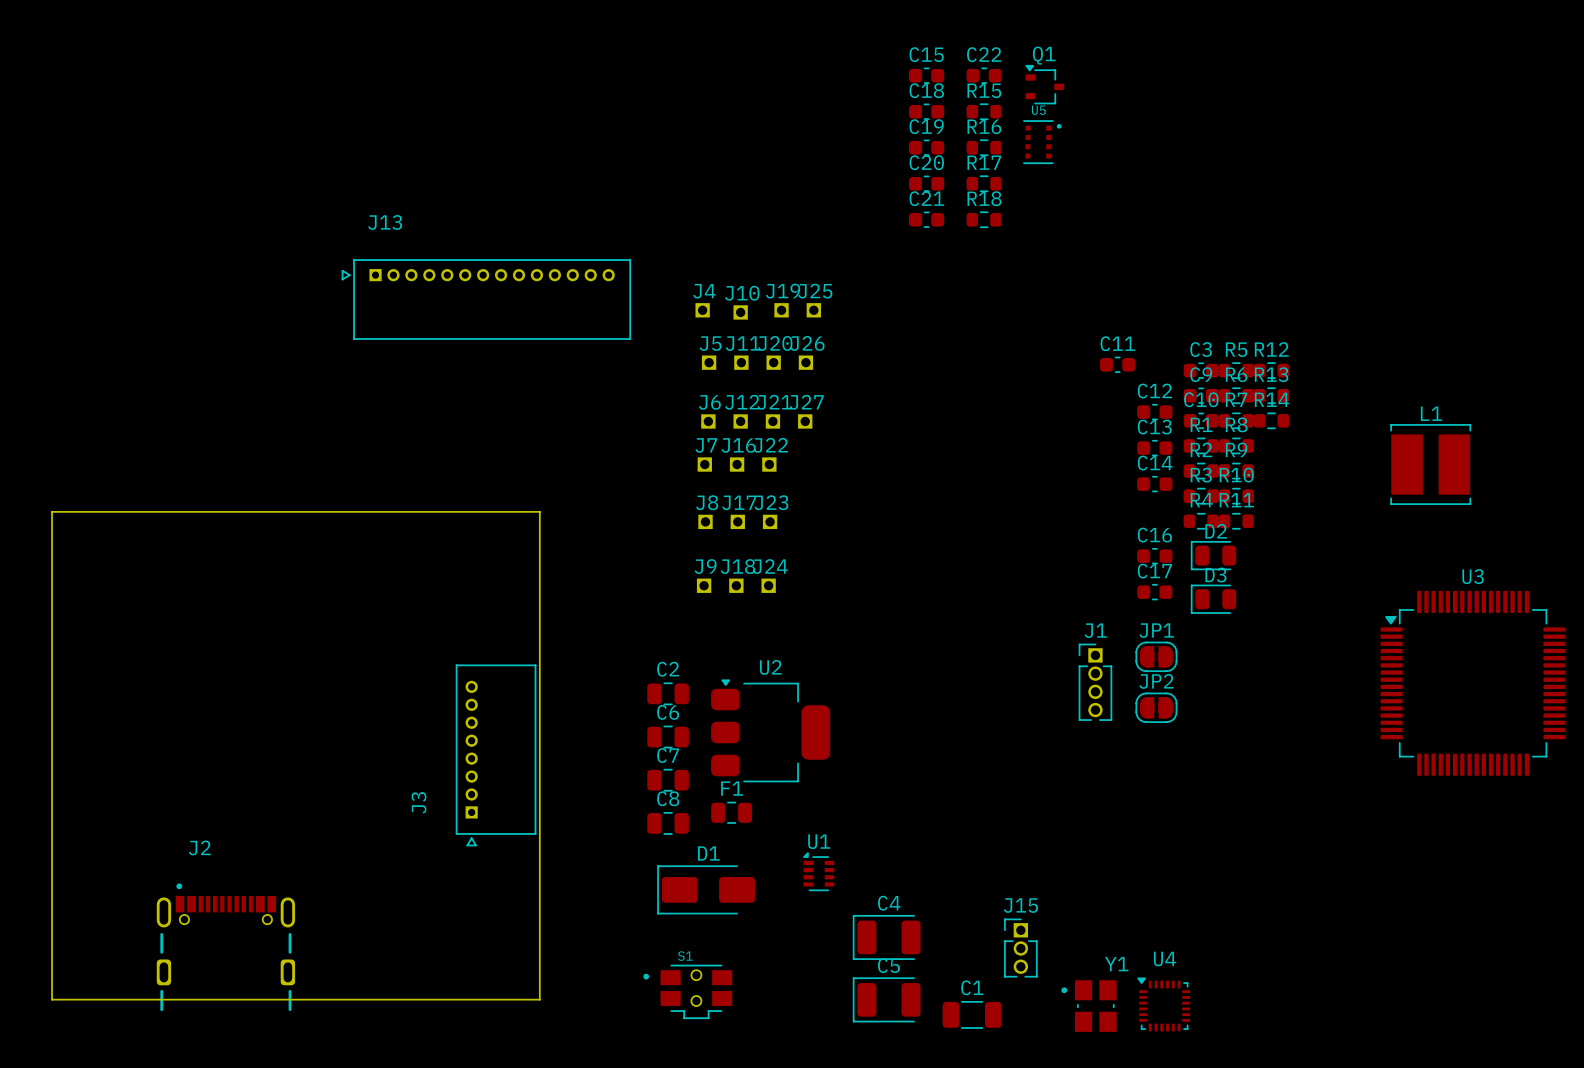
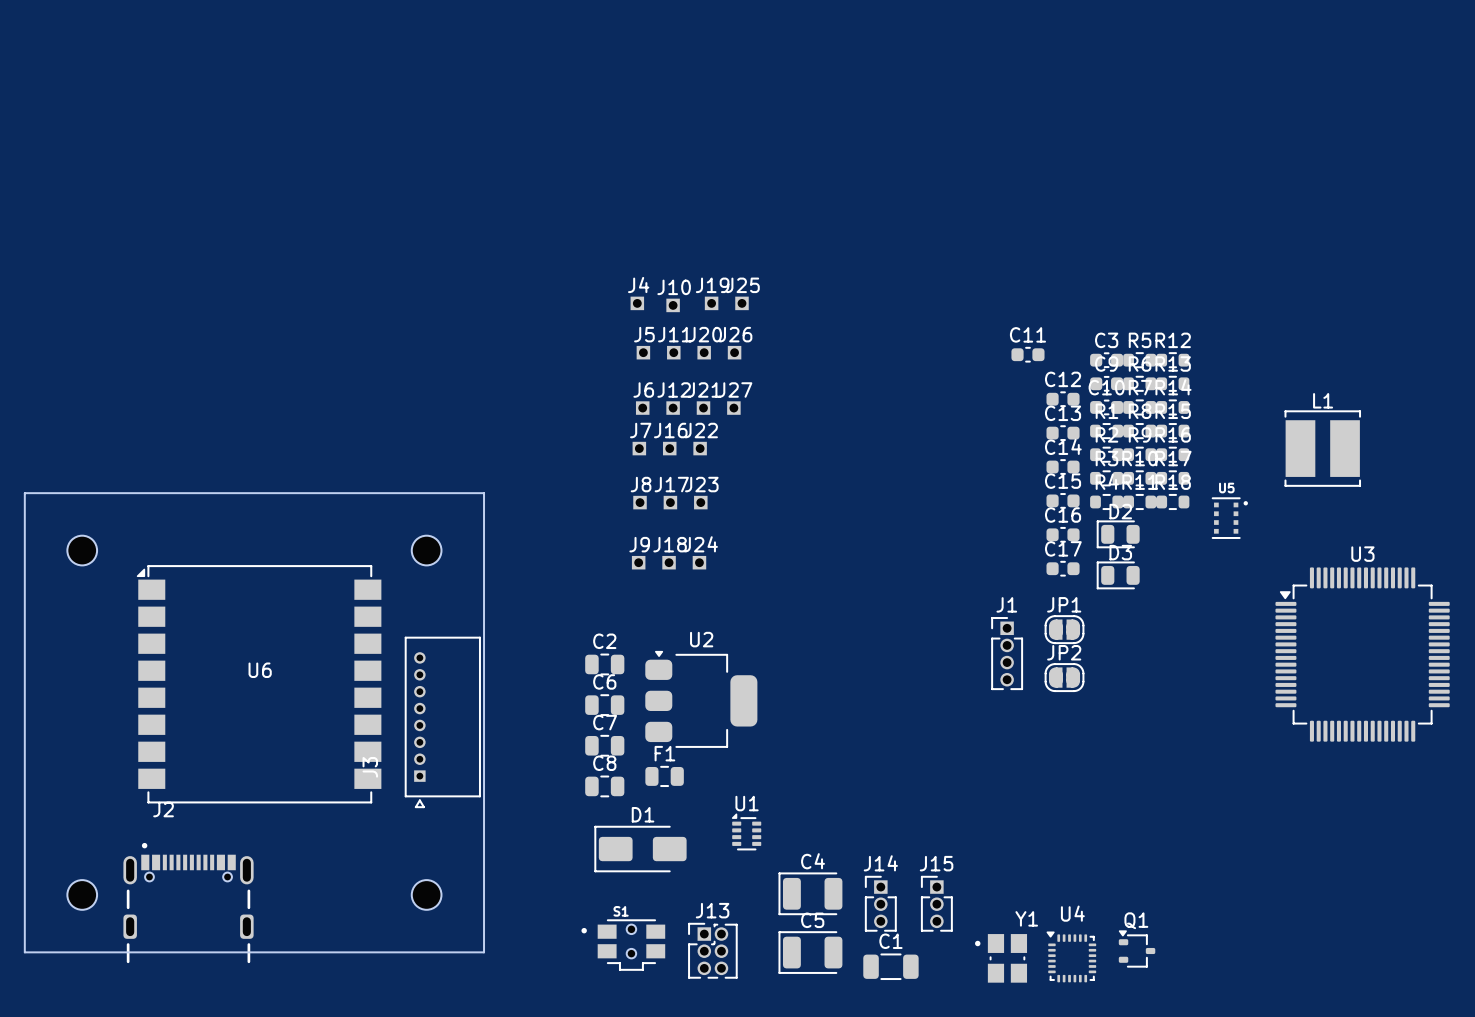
C15 position: (926, 75) -> (1063, 500)
C22: (984, 75) -> none
Q1 position: (1044, 84) -> (1137, 948)
C18: (926, 111) -> none
R15 position: (984, 111) -> (1172, 431)
U5 position: (1042, 142) -> (1229, 518)
C19: (926, 147) -> none
R16 position: (984, 147) -> (1172, 454)
C20: (926, 183) -> none
R17 position: (984, 183) -> (1172, 478)
C21: (926, 219) -> none
R18 position: (984, 219) -> (1172, 501)
J13 name position: J13 (385, 222) -> J13 (712, 910)
J13 footprint: [341, 259, 632, 340] -> [688, 922, 738, 979]
part: none -> (82, 550)
part: none -> (426, 550)
U6: none -> (259, 684)
part: none -> (82, 894)
part: none -> (426, 894)
J14: none -> (880, 903)

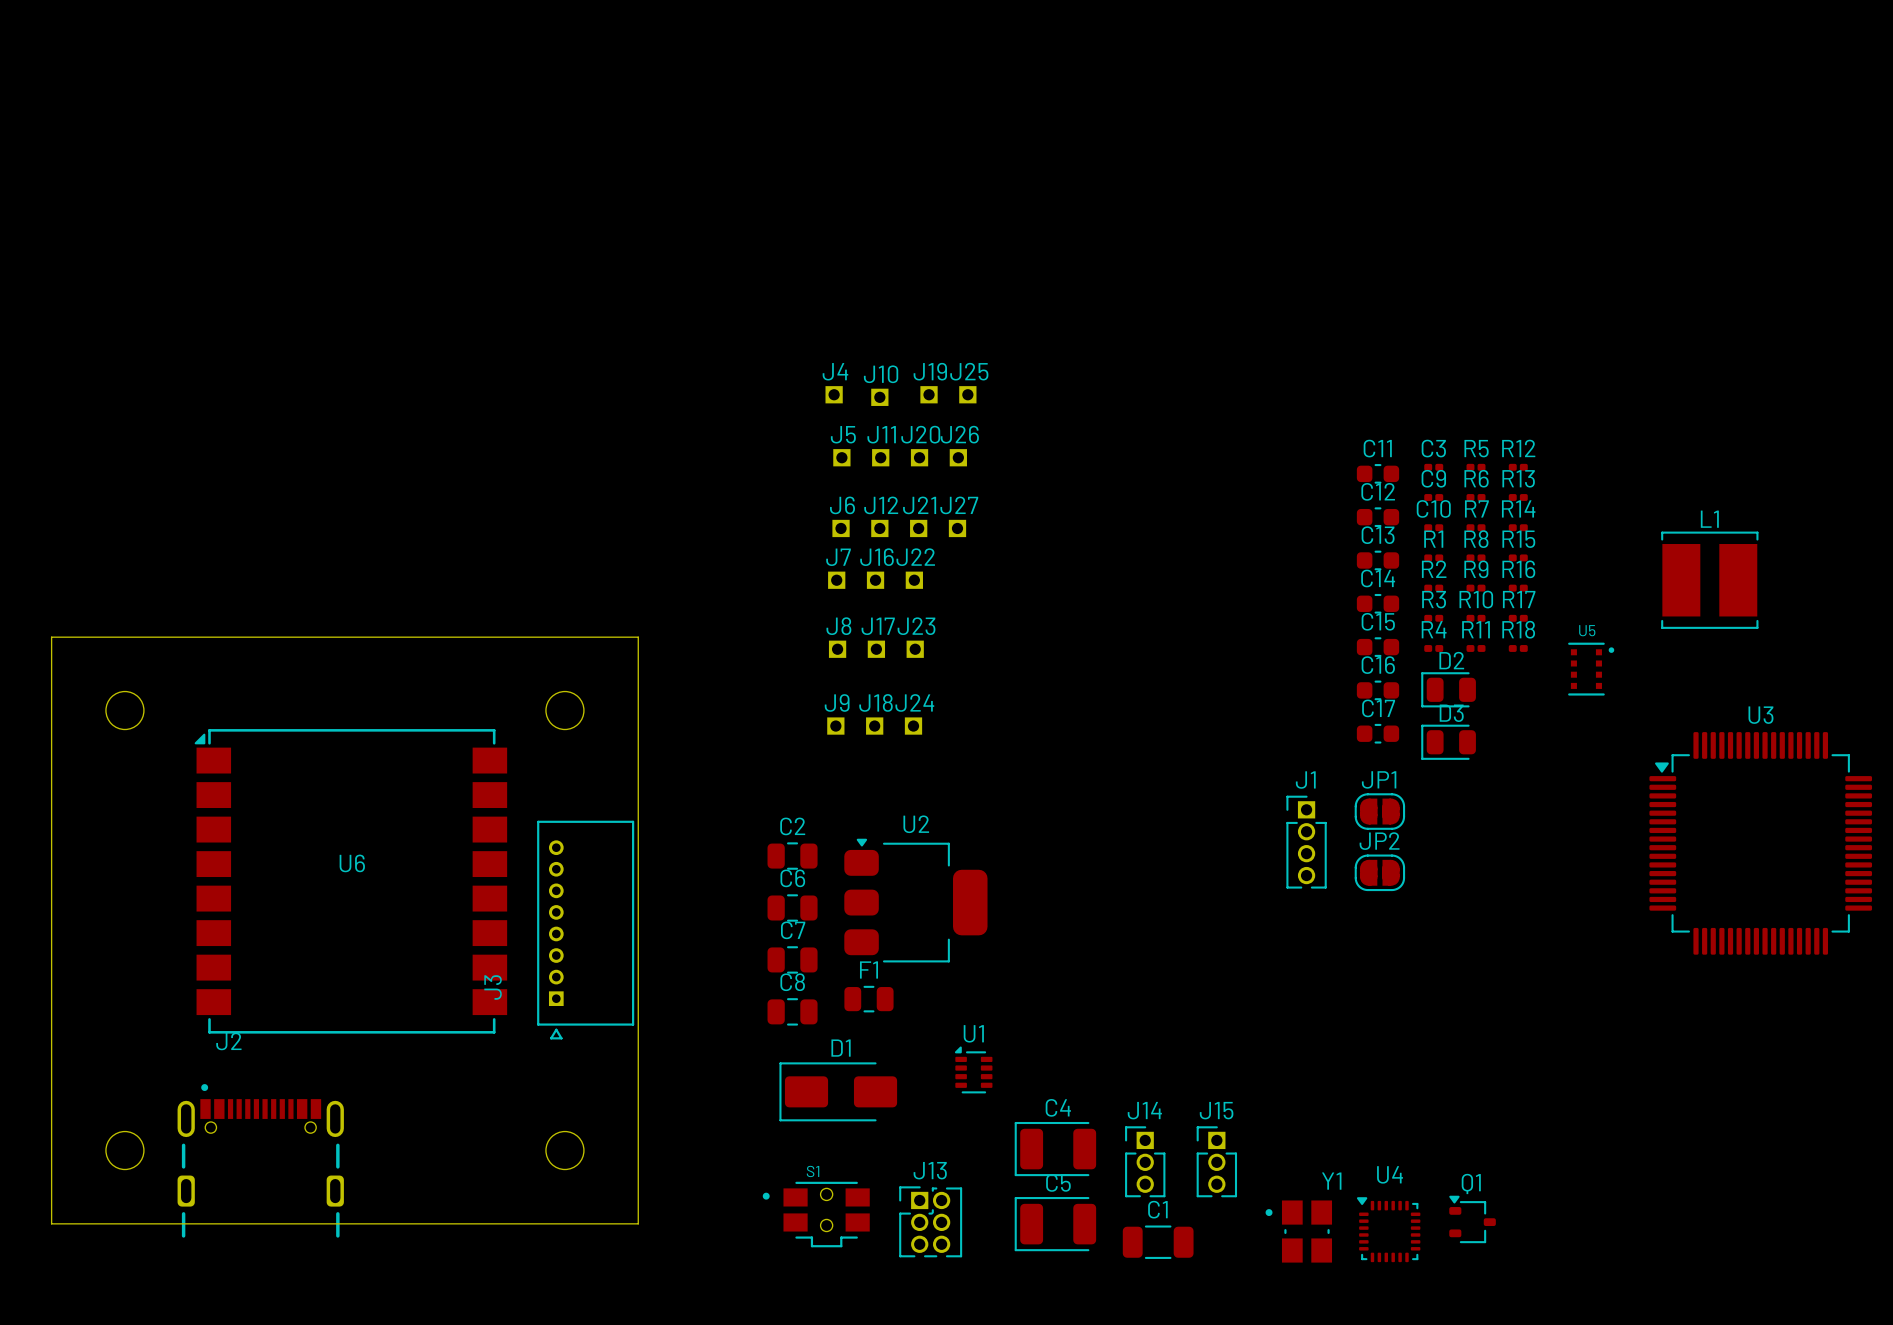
C3 footprint: [1090, 352, 1124, 368] -> [1424, 463, 1444, 471]
R5 footprint: [1123, 352, 1157, 369] -> [1466, 463, 1486, 471]
R12 footprint: [1156, 352, 1190, 369] -> [1508, 463, 1528, 471]
C11 position: (1027, 354) -> (1378, 473)
R6 footprint: [1123, 375, 1157, 392] -> [1466, 494, 1486, 501]
R13 footprint: [1156, 375, 1190, 392] -> [1508, 494, 1528, 501]
C9 footprint: [1090, 376, 1124, 392] -> [1424, 494, 1444, 501]
C10 footprint: [1090, 399, 1124, 416] -> [1424, 524, 1444, 532]
R7 footprint: [1123, 399, 1157, 416] -> [1466, 524, 1486, 532]
R14 footprint: [1156, 399, 1190, 416] -> [1508, 524, 1528, 532]
R1 footprint: [1090, 423, 1124, 439] -> [1424, 554, 1444, 562]
R8 footprint: [1123, 423, 1157, 439] -> [1466, 554, 1486, 562]
R15 footprint: [1156, 423, 1190, 439] -> [1508, 554, 1528, 562]
R2 footprint: [1090, 446, 1124, 463] -> [1424, 584, 1444, 592]
R9 footprint: [1123, 446, 1157, 463] -> [1466, 584, 1486, 592]
R16 footprint: [1156, 446, 1190, 463] -> [1508, 584, 1528, 592]
R3 footprint: [1090, 470, 1124, 487] -> [1424, 614, 1444, 622]
R10 footprint: [1123, 470, 1157, 487] -> [1466, 614, 1486, 622]
R17 footprint: [1156, 470, 1190, 487] -> [1508, 614, 1528, 622]
R4 footprint: [1090, 494, 1124, 510] -> [1424, 645, 1444, 652]
R11 footprint: [1123, 494, 1157, 510] -> [1466, 645, 1486, 652]
R18 footprint: [1156, 494, 1190, 510] -> [1508, 645, 1528, 652]

